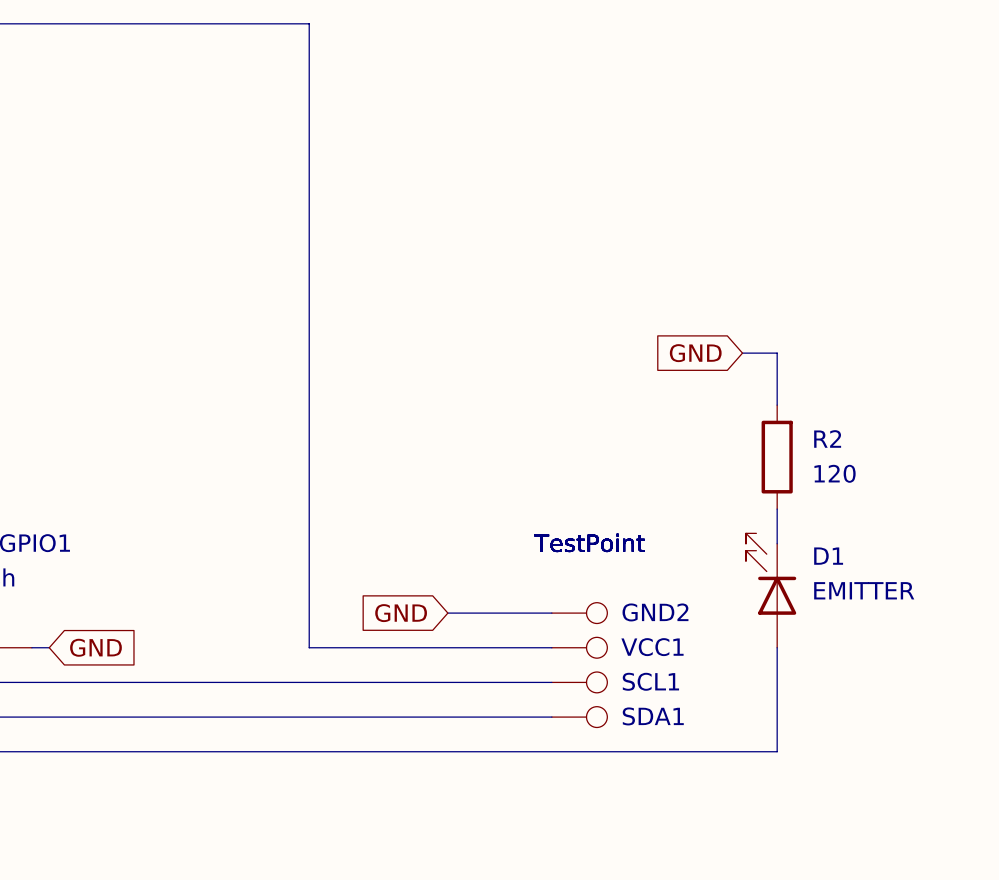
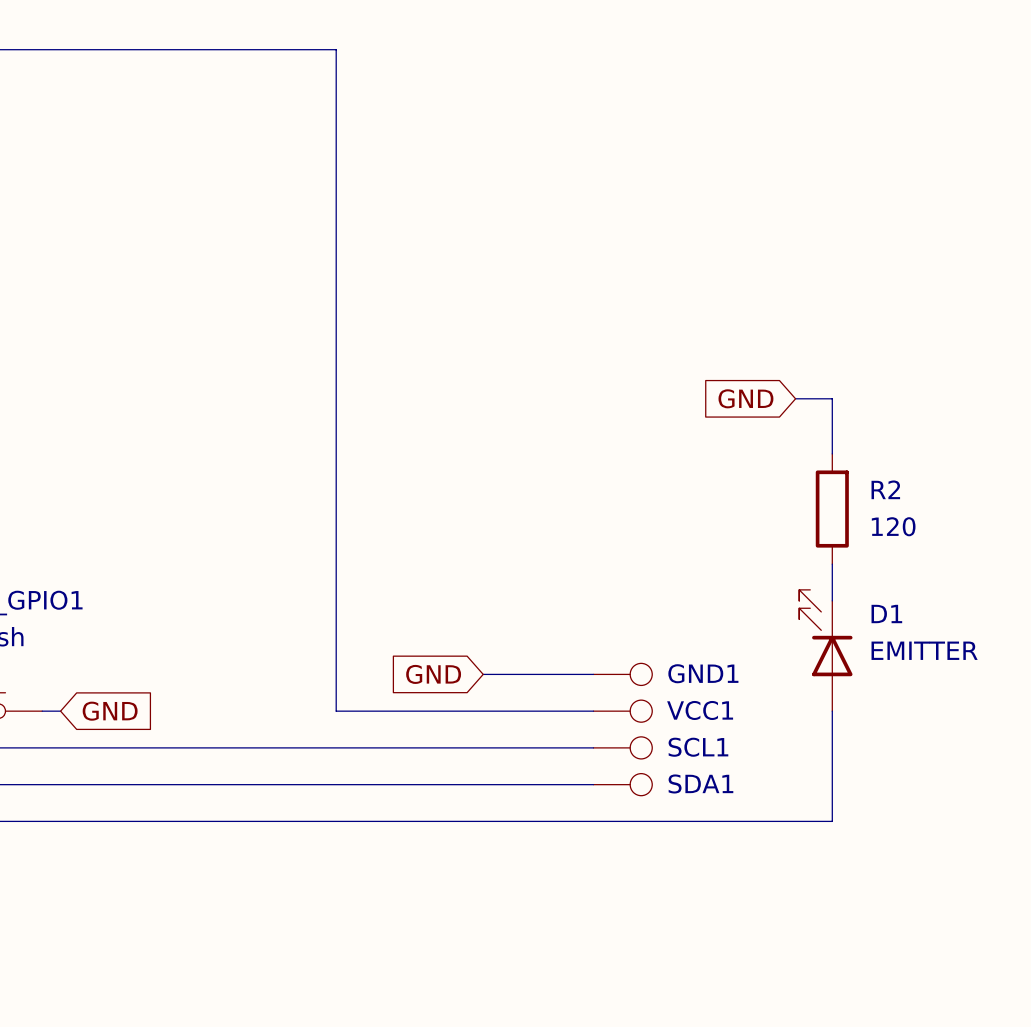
GND2 value: TestPoint (589, 542) -> none
VCC1 value: TestPoint (589, 542) -> none
SDA1 value: TestPoint (589, 542) -> none
SCL1 value: TestPoint (589, 542) -> none
GND2 name: GND2 (655, 612) -> GND1 (703, 673)

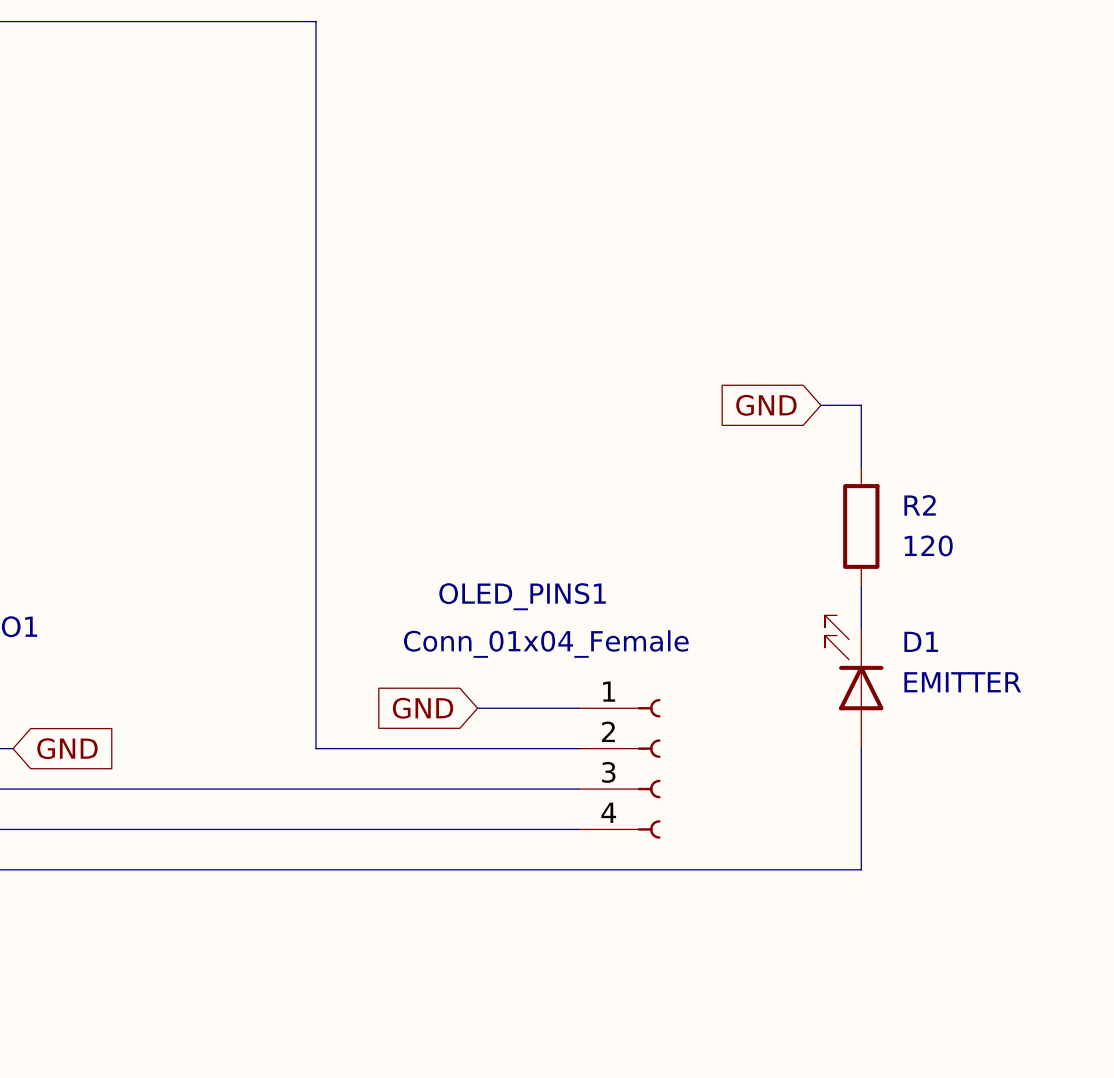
GND1: (622, 674) -> none
VCC1: (622, 711) -> none
OLED_PINS1: none -> Conn_01x04_Female (619, 768)
SCL1: (622, 747) -> none
SDA1: (622, 784) -> none

